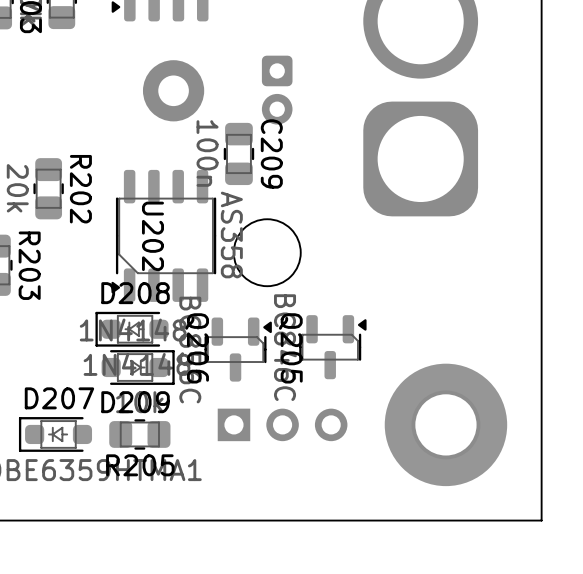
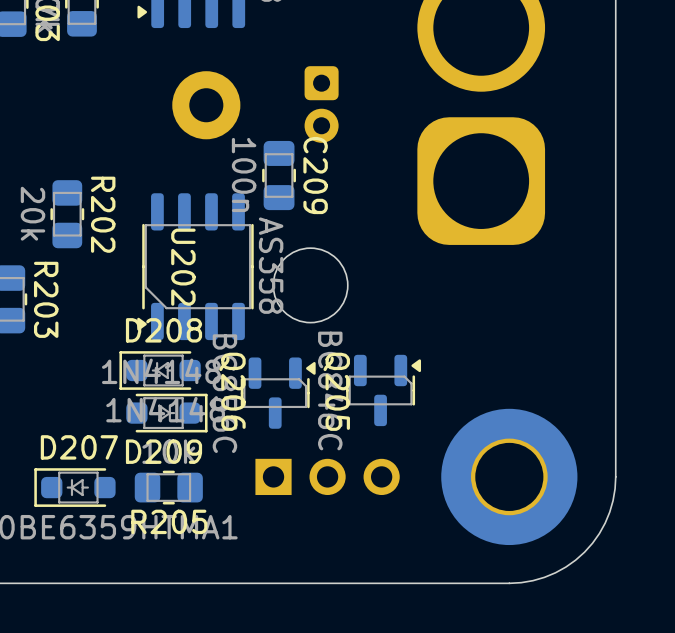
board edge: (541, 424) (541, 520) (445, 520) -> (615, 476) (613, 500) (605, 523) (584, 552) (555, 572) (533, 580) (509, 583)

